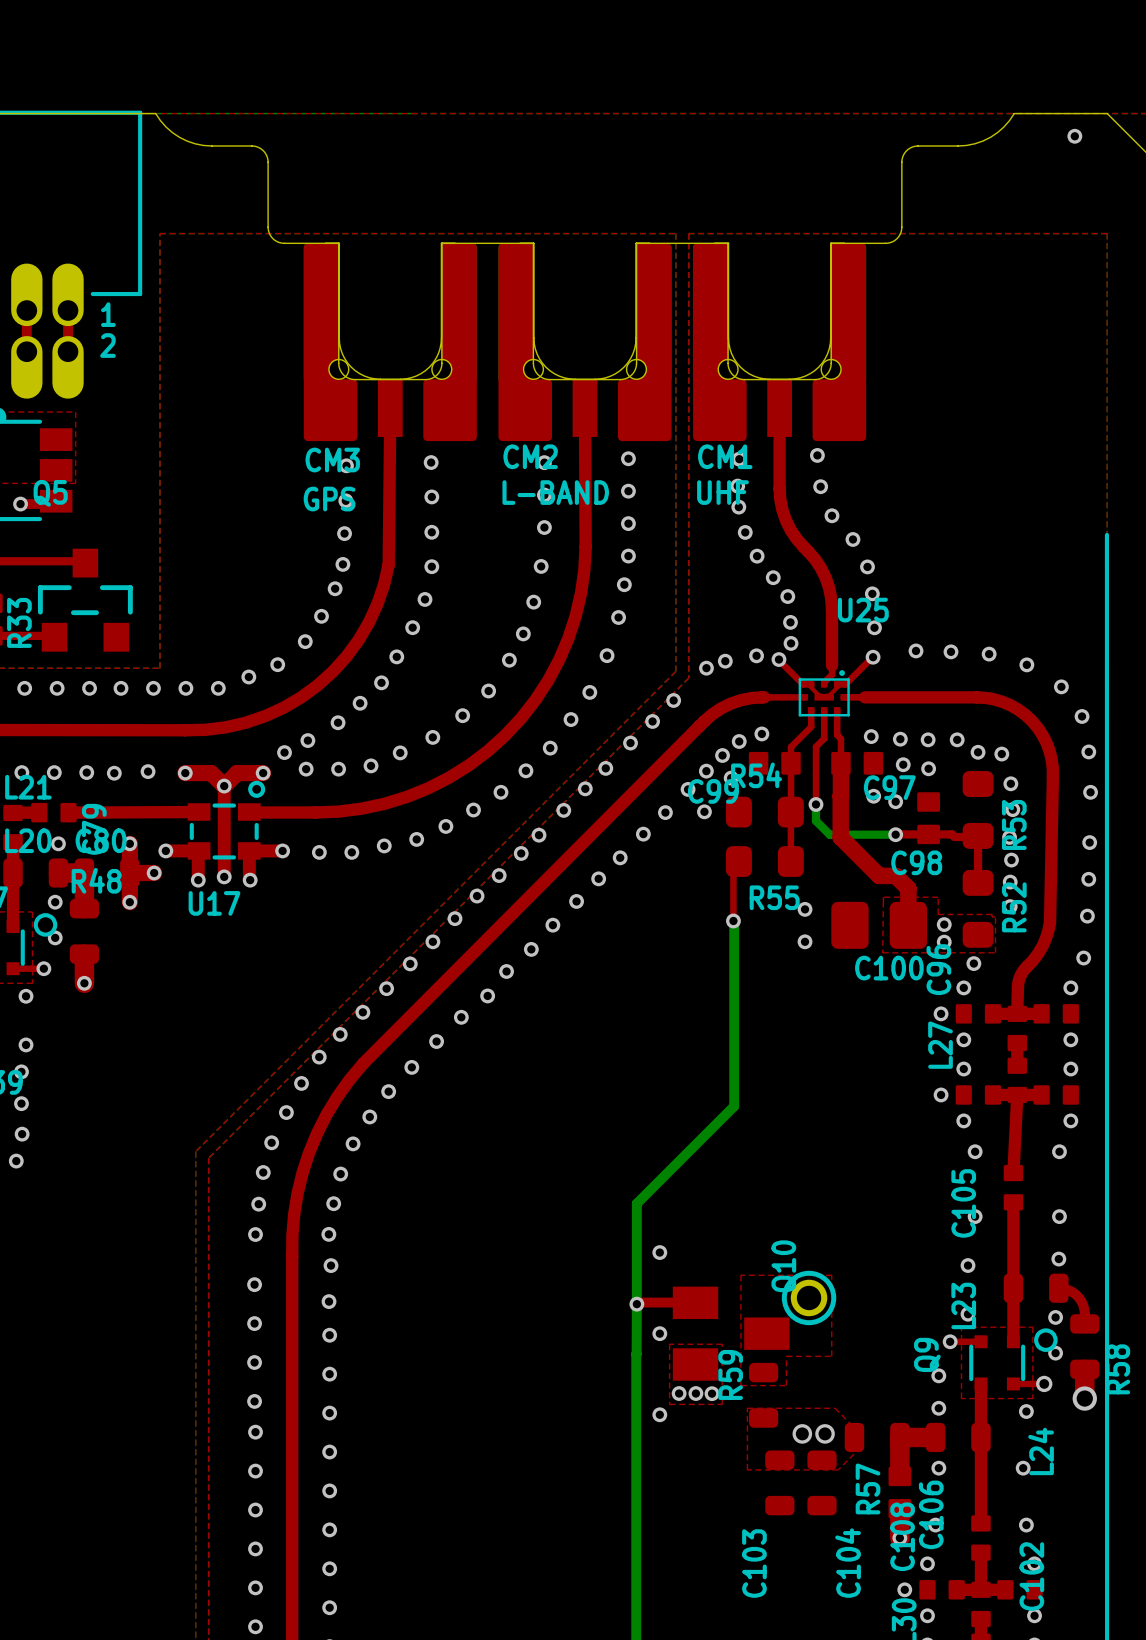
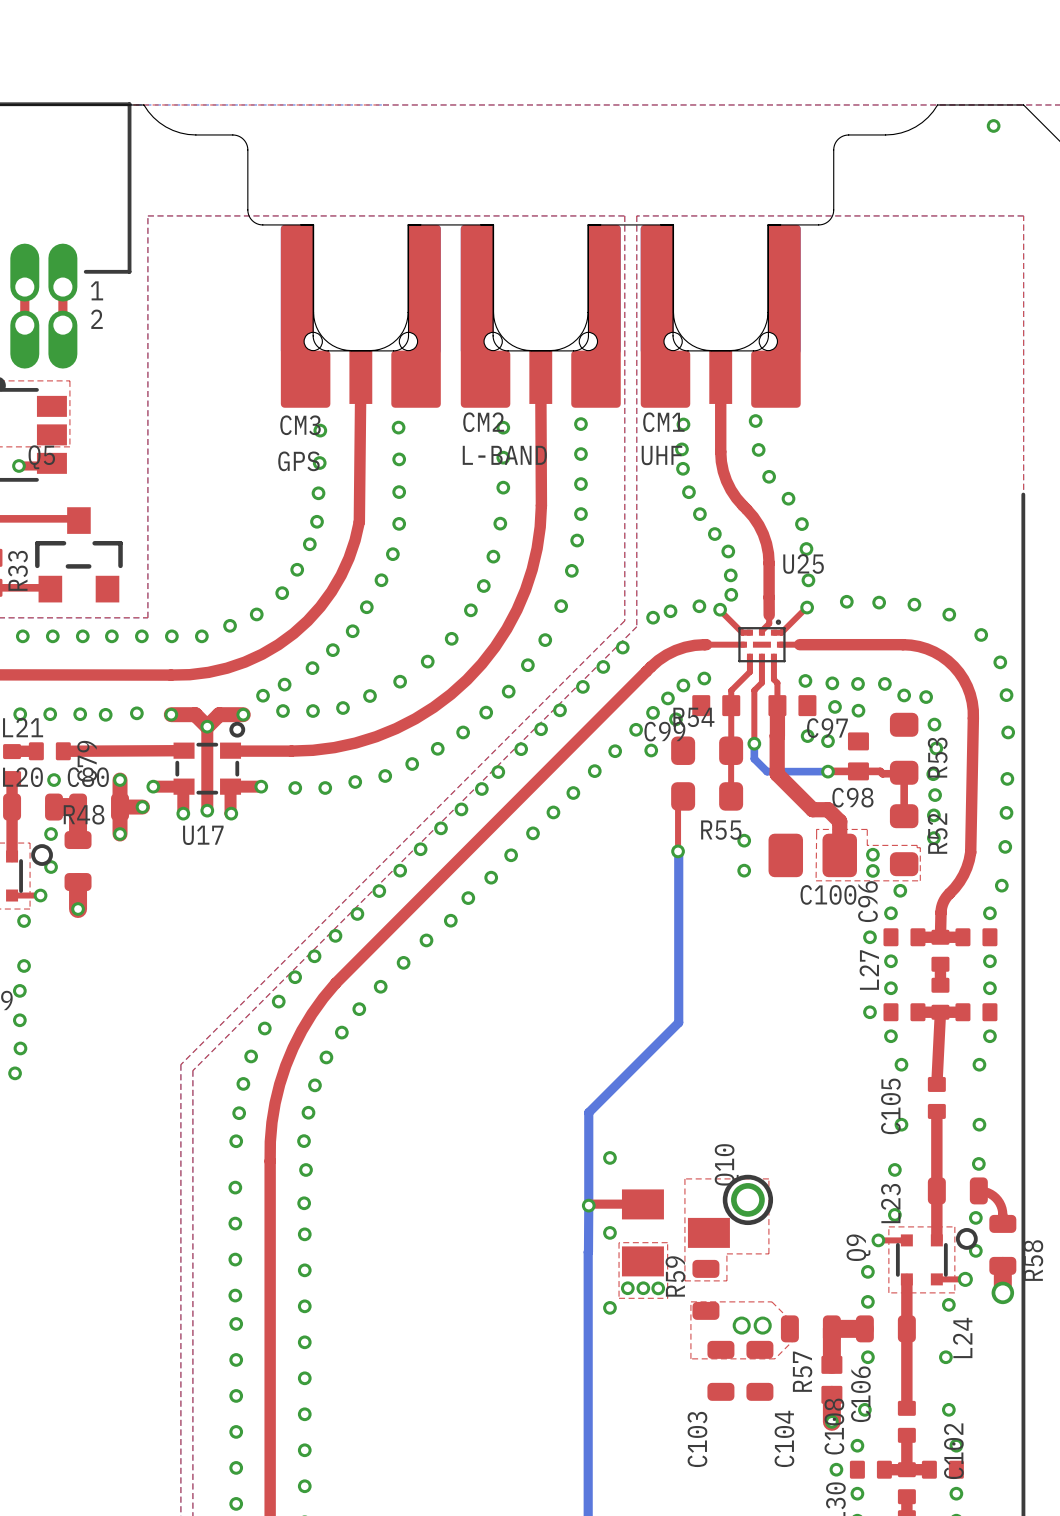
top track: (809, 686) (819, 695) (824, 696) (829, 695) (838, 686) -> none

